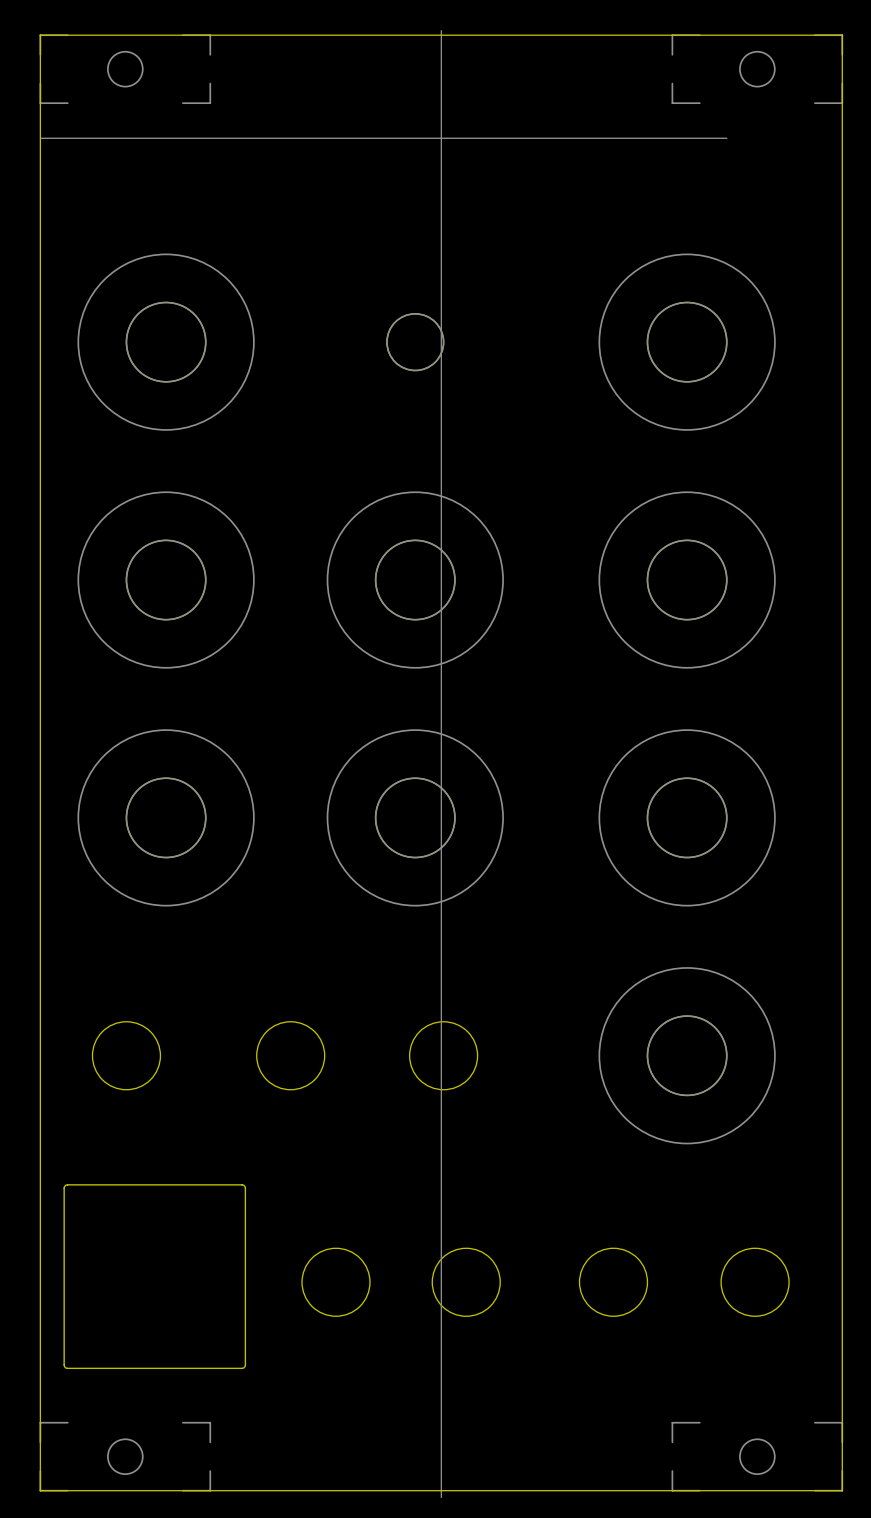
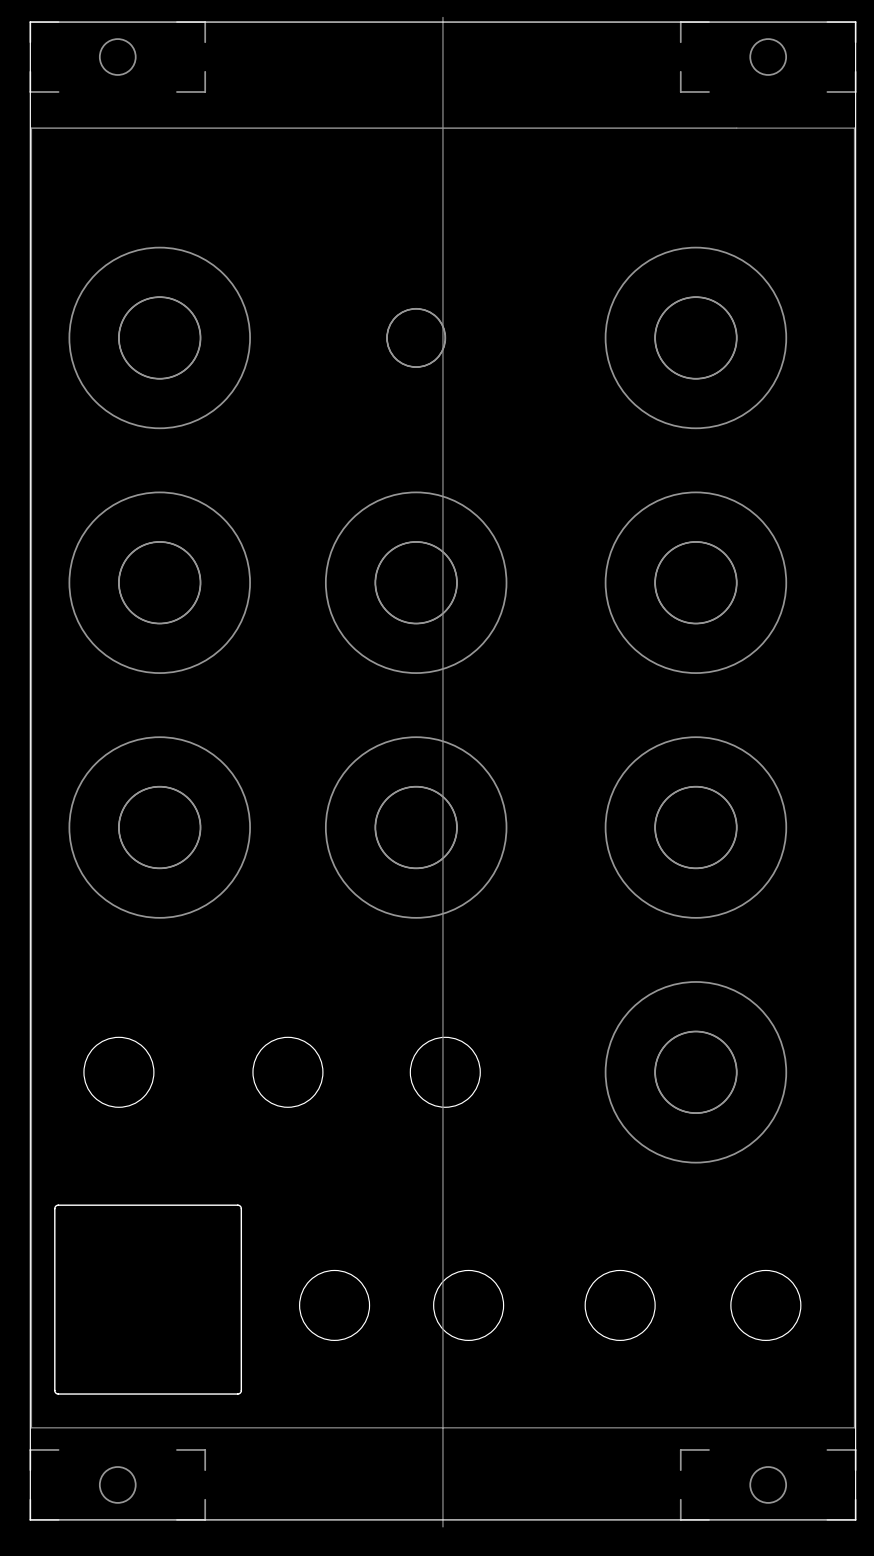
line: none -> (31, 128) (31, 1427) (854, 1427) (854, 128) (736, 128)

